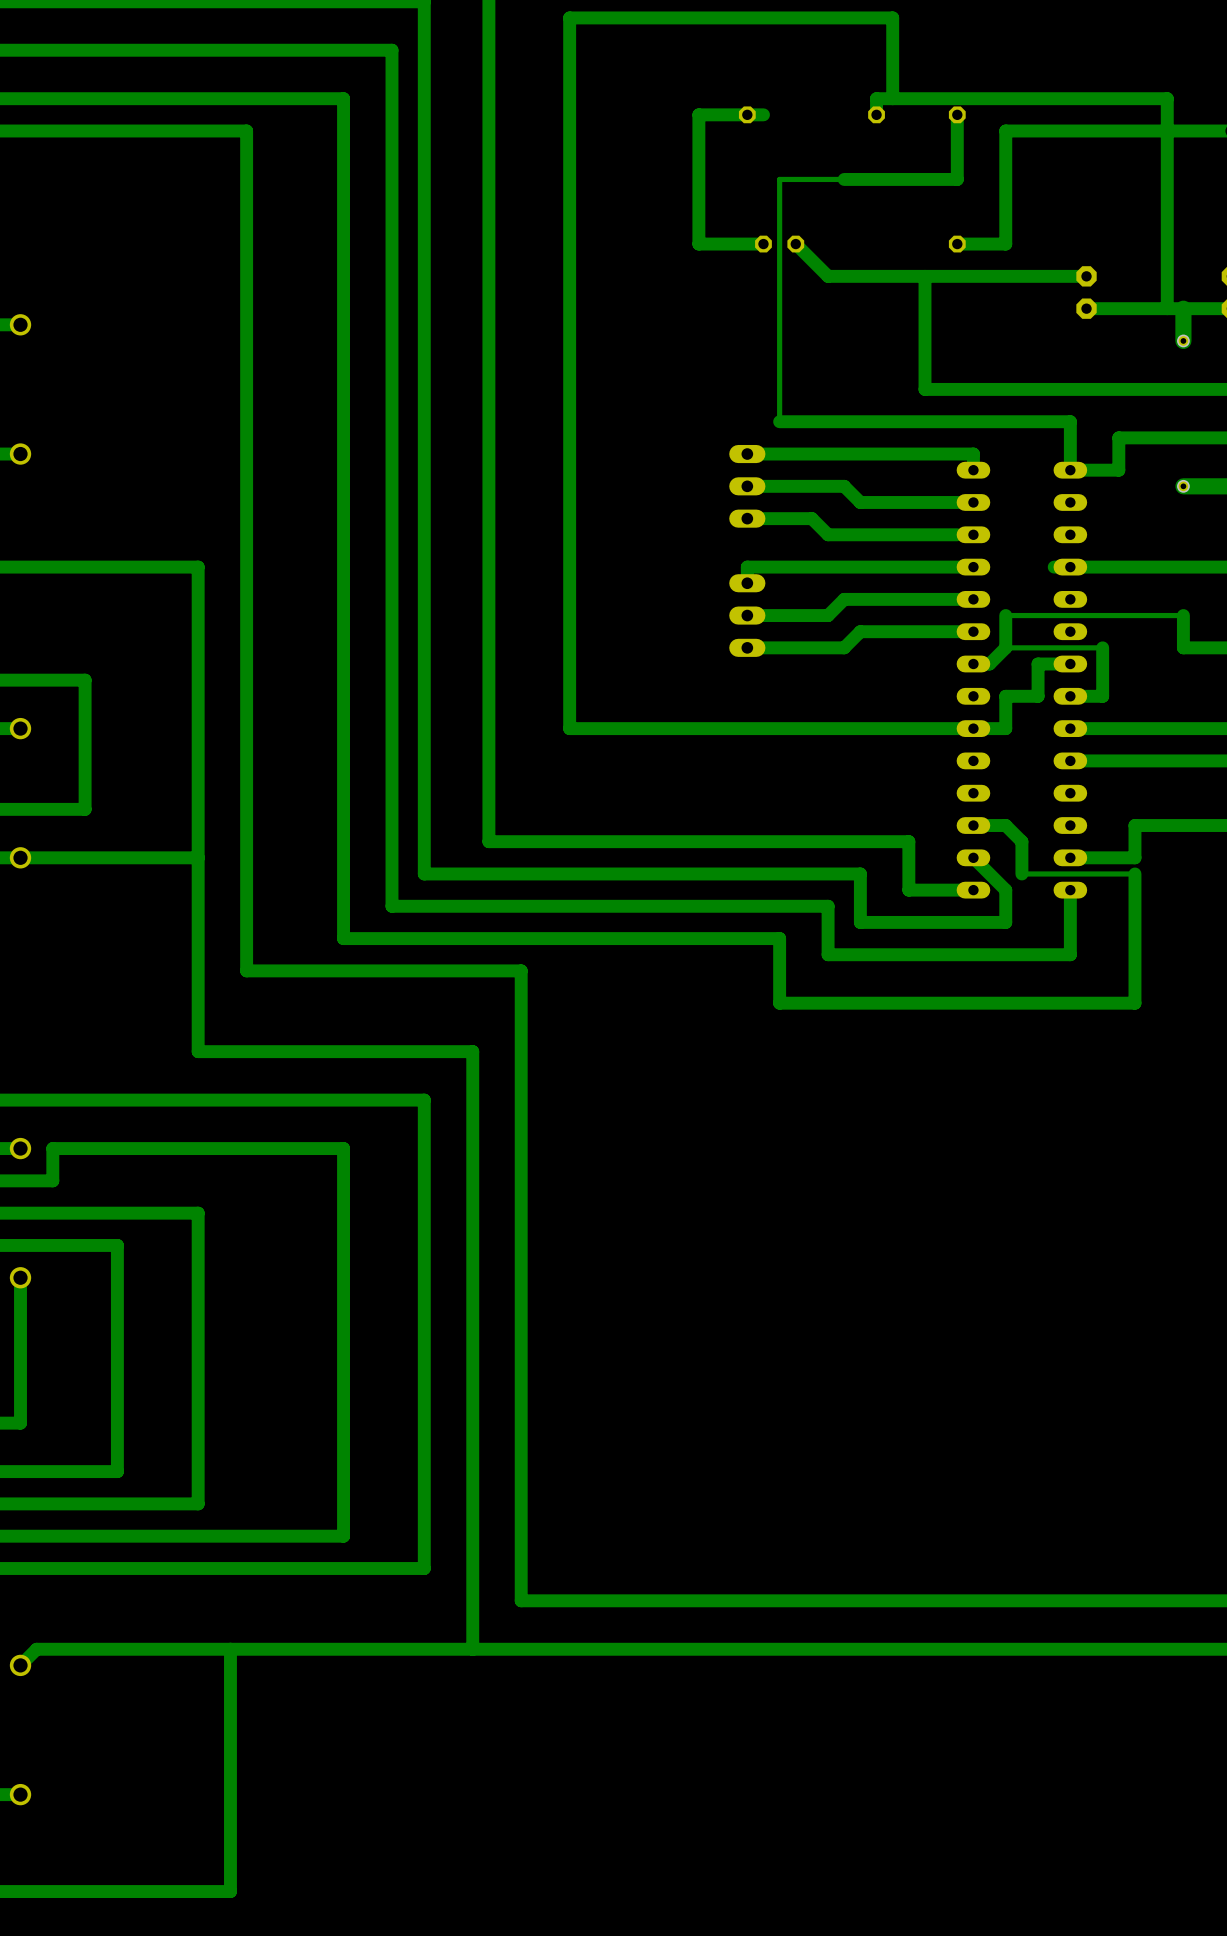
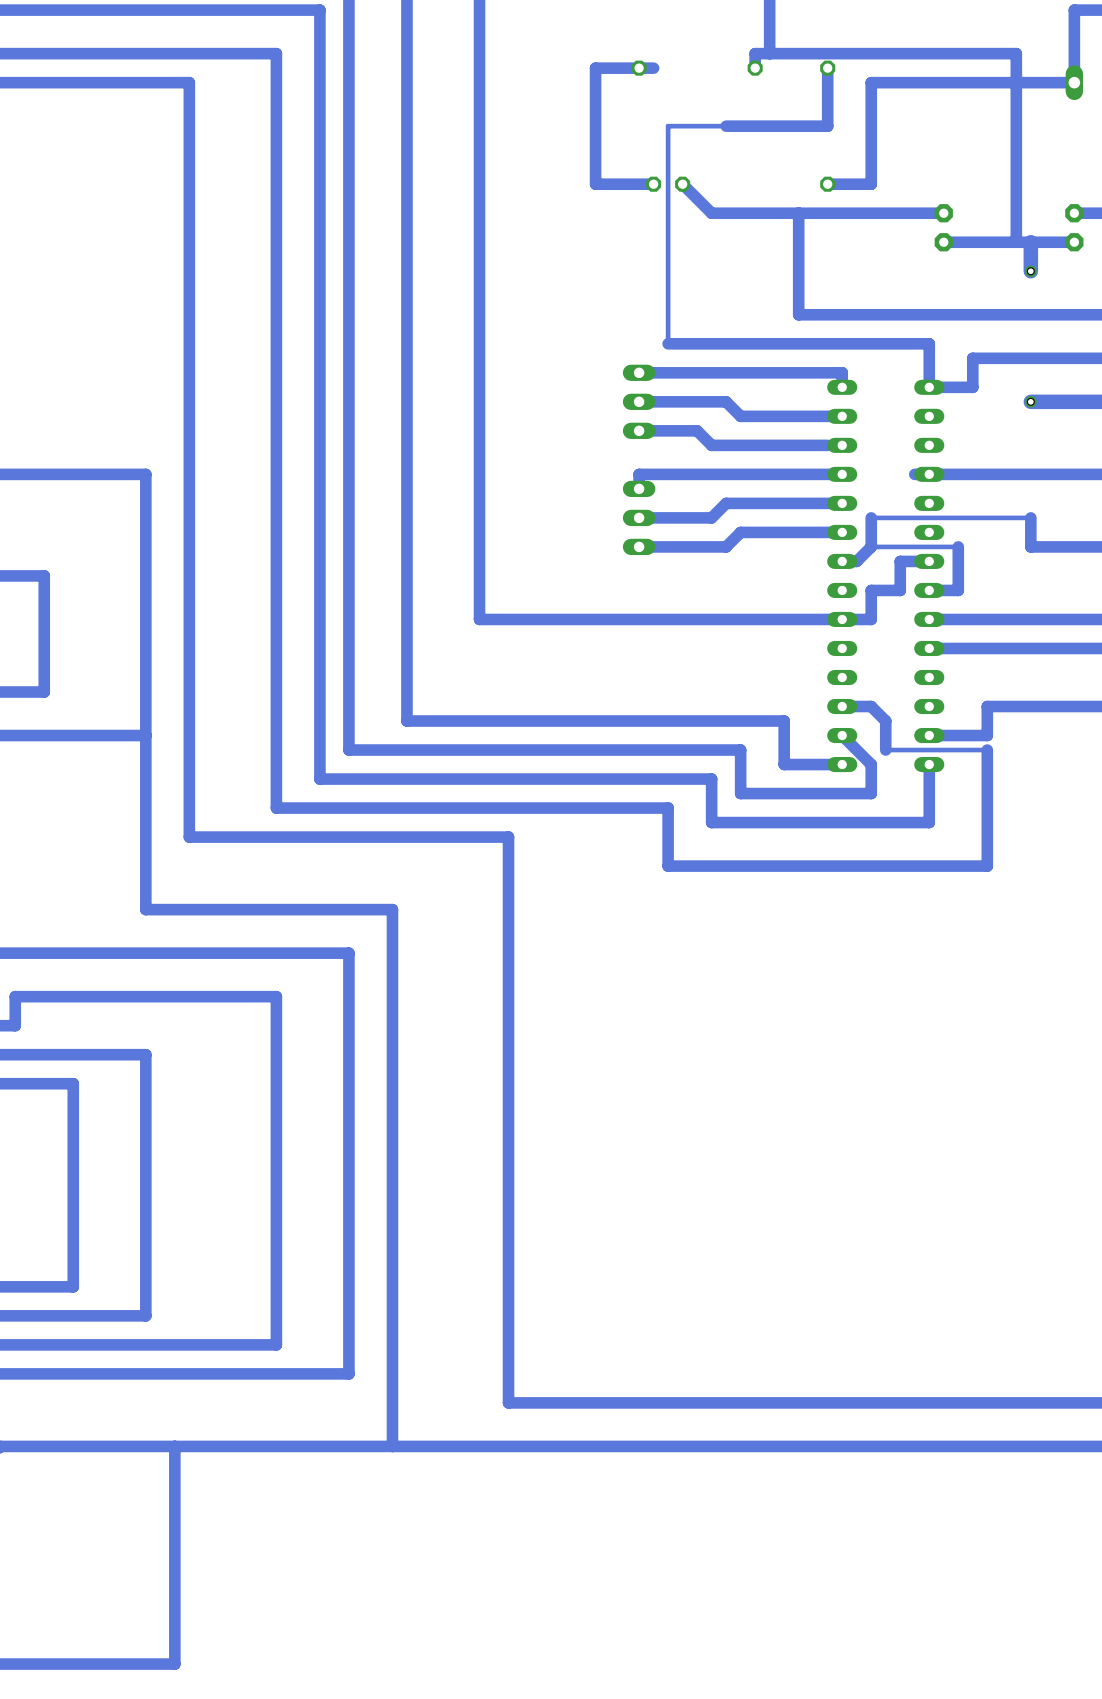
track: (521, 970) (521, 1600) (601, 1600) -> (435, 837) (508, 837) (508, 1402)

